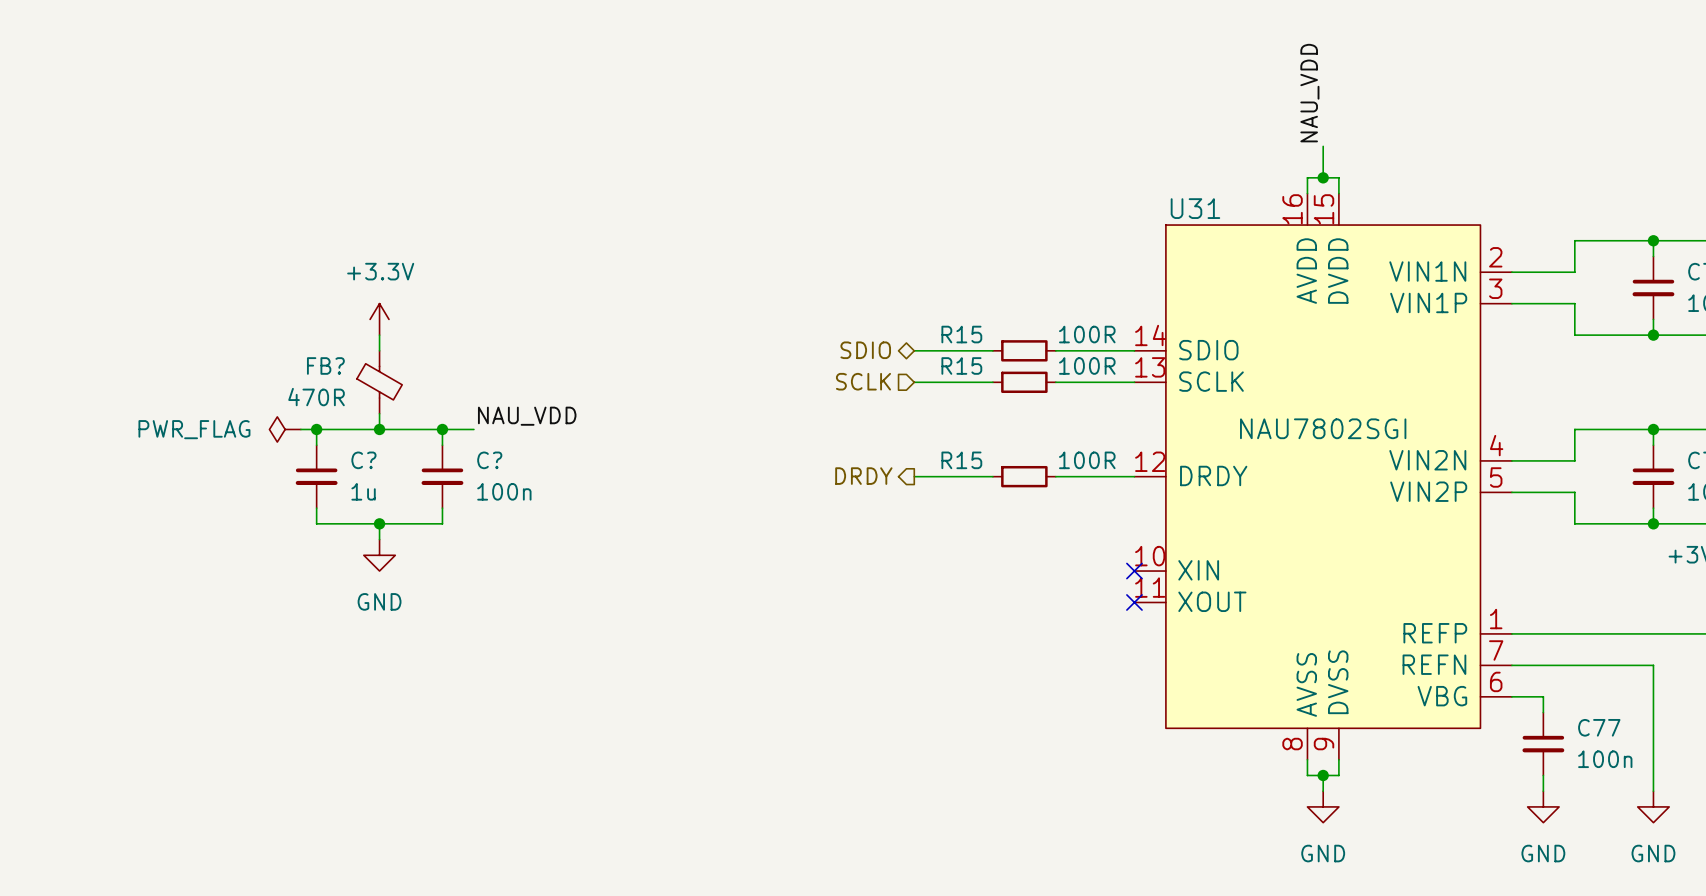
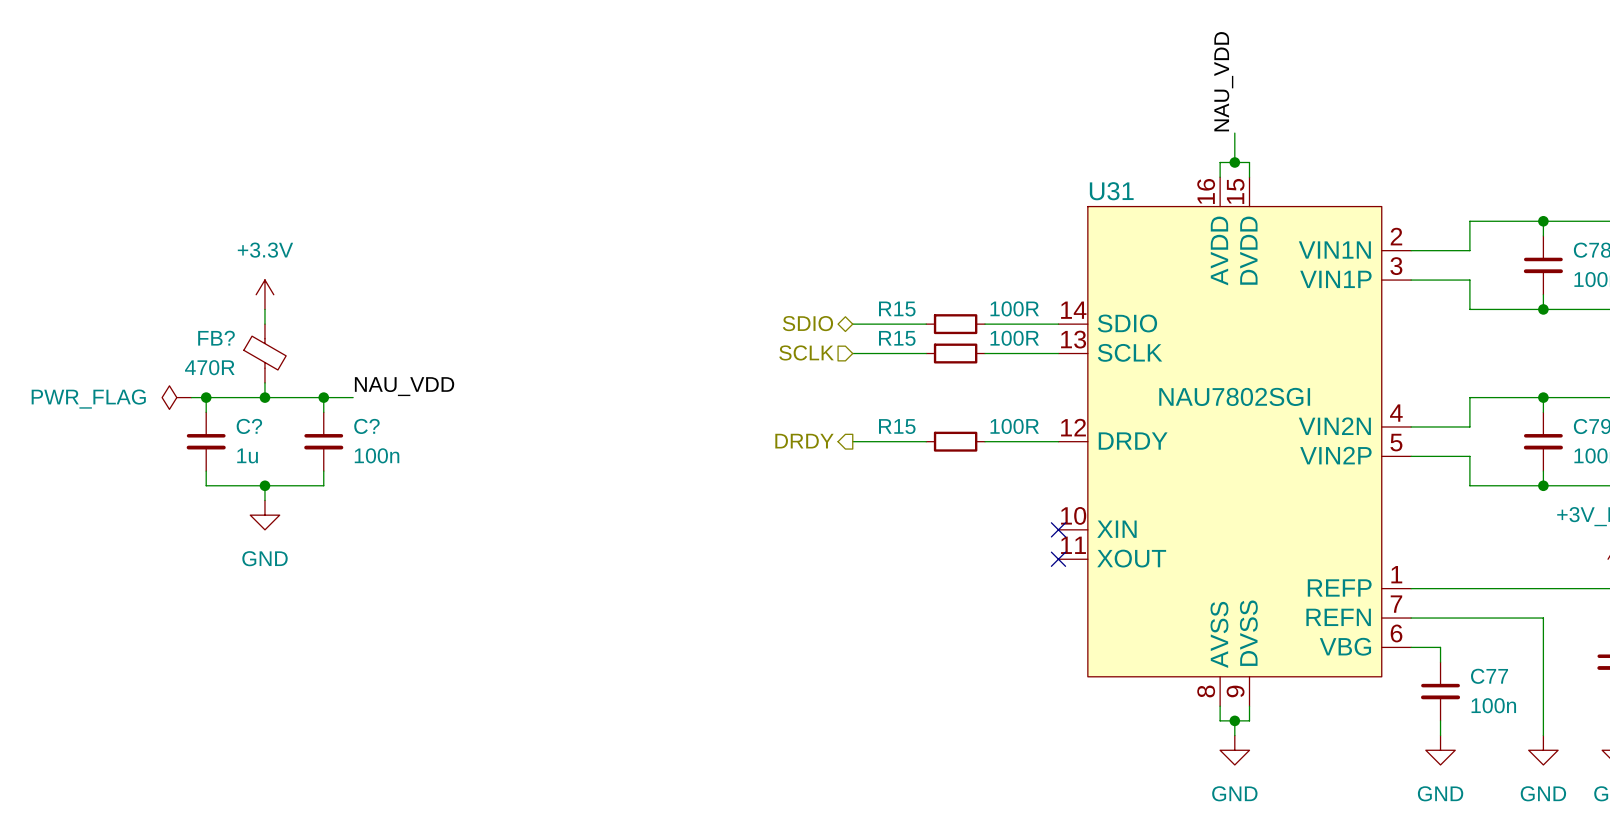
power symbol position: +3.3V (379, 319) -> +3.3V (264, 294)
wire: (379, 335) (379, 350) -> (264, 309) (264, 324)
FB? position: (379, 382) -> (264, 353)
wire: none -> (264, 382) (264, 397)
wire: (379, 413) (379, 429) (473, 429) -> none
label position: NAU_VDD (527, 416) -> NAU_VDD (404, 386)
wire: none -> (191, 397) (279, 397)
junction: none -> (206, 397)
junction: none -> (264, 397)
power symbol position: PWR_FLAG (285, 429) -> PWR_FLAG (176, 397)
wire: (316, 429) (316, 445) -> (206, 397) (206, 412)
junction: (316, 429) -> none
junction: none -> (323, 397)
junction: (379, 429) -> none
wire: (442, 429) (442, 445) -> (323, 397) (323, 412)
junction: (442, 429) -> none
C? position: (316, 476) -> (206, 441)
C? position: (442, 476) -> (323, 441)
wire: (316, 508) (316, 523) -> (206, 471) (206, 485) (294, 485)
wire: (442, 508) (442, 523) (348, 523) -> (323, 471) (323, 485)
junction: none -> (264, 485)
wire: (379, 523) (379, 539) -> (264, 485) (264, 500)
junction: (379, 523) -> none
power symbol position: GND (379, 555) -> GND (264, 515)

